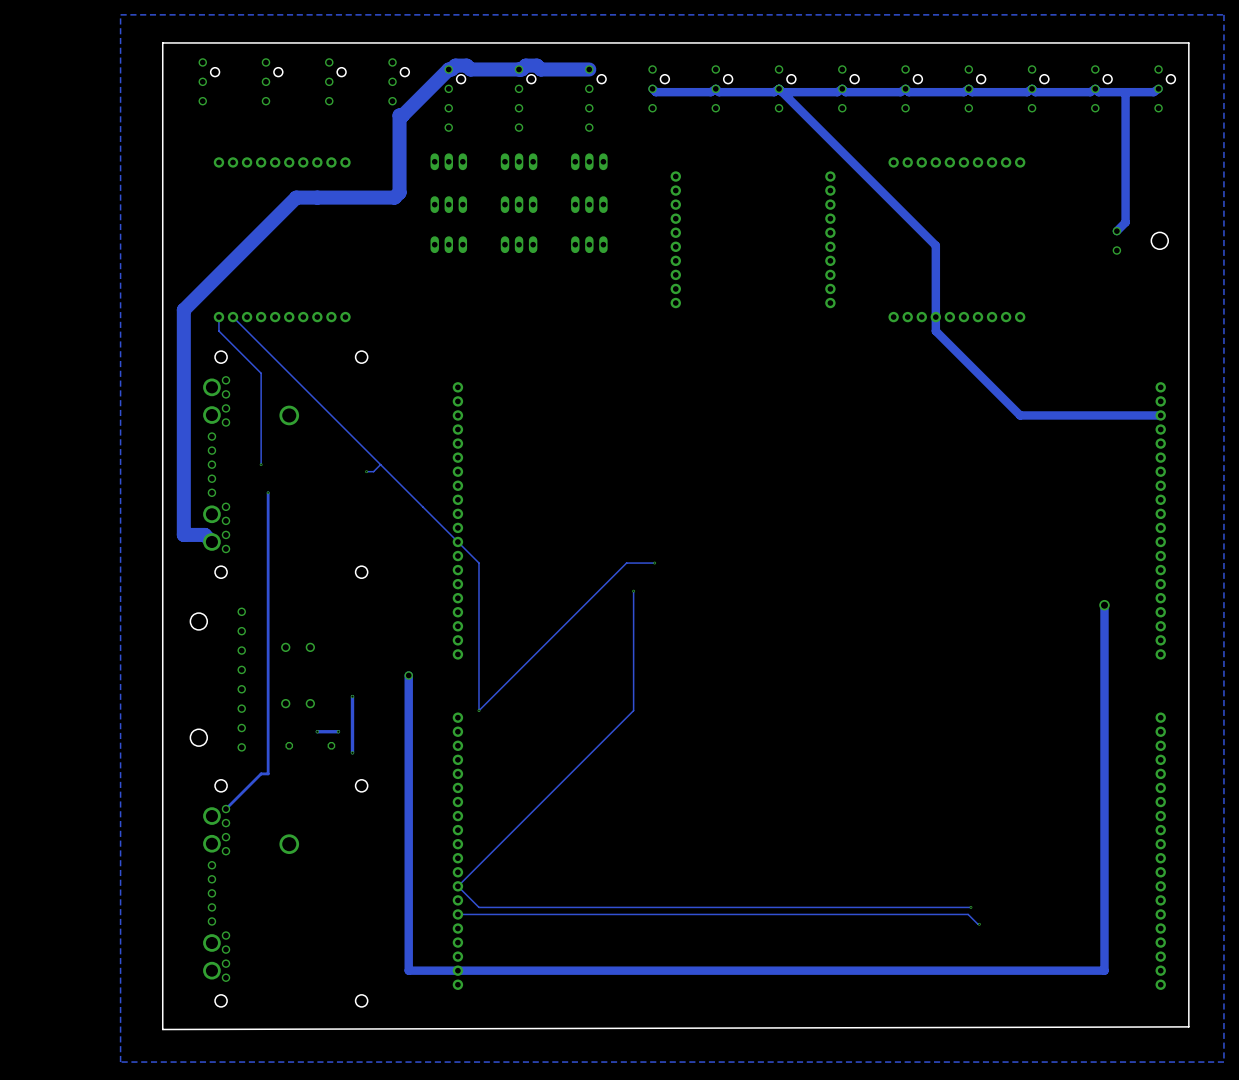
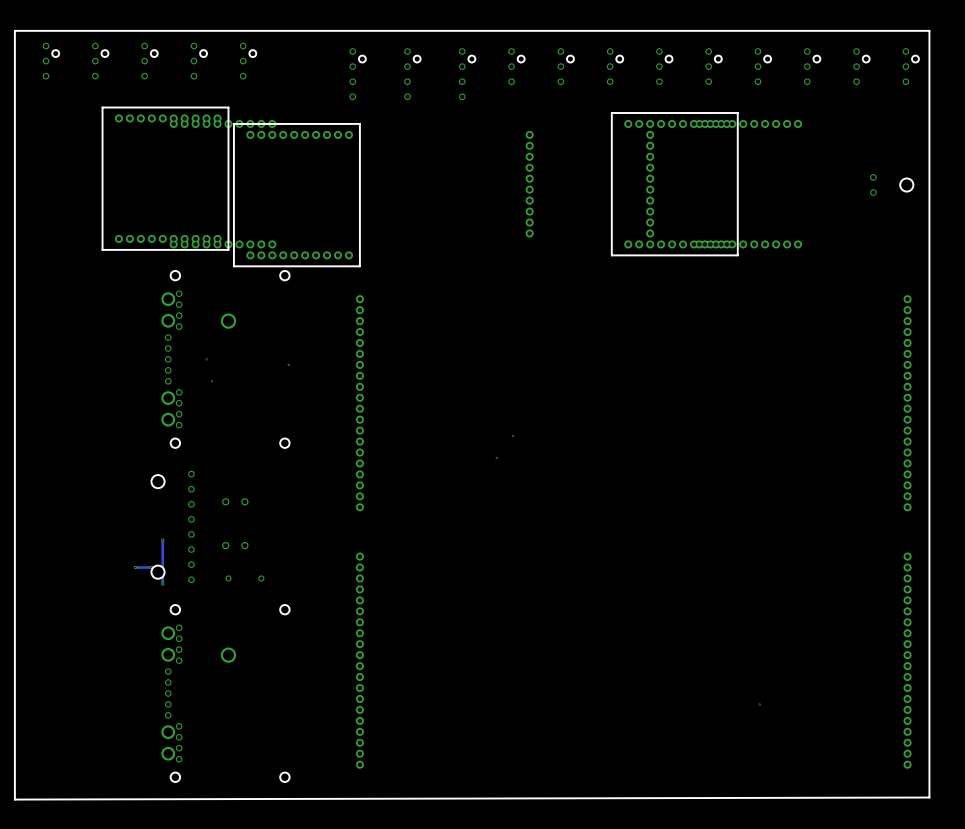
zone outline: (1223, 14) (1223, 1062) (120, 1062) (120, 14) (1223, 14) -> none
board edge: (162, 42) (162, 1029) (1188, 1026) -> (129, 30) (14, 30) (14, 799) (929, 797)
track: (589, 69) (540, 69) (536, 65) (525, 65) (521, 69) (470, 69) (466, 65) (455, 65) (448, 69) (402, 115) (399, 115) (399, 192) (394, 197) (296, 197) (183, 310) (183, 534) (204, 534) (211, 541) -> none
part: none -> (50, 61)
part: none -> (100, 61)
part: none -> (149, 61)
part: (209, 81) -> none
part: none -> (198, 61)
part: (272, 81) -> none
part: none -> (248, 61)
part: (335, 81) -> none
part: (398, 81) -> none
track: (652, 88) (655, 92) (710, 92) (715, 88) (719, 92) (774, 92) (779, 88) (935, 245) (935, 331) (1020, 415) (1160, 415) -> none
track: (1158, 88) (1153, 92) (1098, 92) (1095, 88) (1090, 92) (1035, 92) (1032, 88) (1027, 92) (972, 92) (968, 88) (963, 92) (908, 92) (905, 88) (900, 92) (845, 92) (842, 88) (837, 92) (782, 92) -> none
track: (1125, 92) (1125, 222) (1116, 231) -> none
part: (448, 161) -> none
part: (519, 161) -> none
part: (589, 161) -> none
part: (448, 204) -> none
part: (519, 204) -> none
part: (589, 204) -> none
part: none -> (165, 178)
part: none -> (674, 184)
part: (448, 244) -> none
part: (519, 244) -> none
part: (589, 244) -> none
part: none -> (296, 195)
track: (218, 317) (218, 331) (261, 373) (261, 464) -> none
track: (233, 317) (479, 563) (479, 710) (626, 563) (654, 563) -> none
track: (380, 464) (373, 471) (366, 471) -> none
track: (268, 492) (268, 773) (261, 773) (225, 809) -> none
track: (633, 591) (633, 710) (457, 886) (479, 907) (970, 907) -> none
track: (1104, 605) (1104, 970) (408, 970) (408, 675) -> none
via: (1104, 605) -> none
via: (408, 675) -> none
track: none -> (162, 540) (162, 583)
via: none -> (162, 540)
track: (352, 696) (352, 752) -> none
via: (352, 696) -> none
via: (479, 710) -> none
via: none -> (135, 567)
track: none -> (151, 567) (135, 567)
via: none -> (151, 567)
via: (317, 731) -> none
track: (338, 731) (317, 731) -> none
via: (338, 731) -> none
via: none -> (162, 583)
via: (352, 752) -> none
track: (457, 914) (968, 914) (979, 924) -> none
via: (979, 924) -> none

